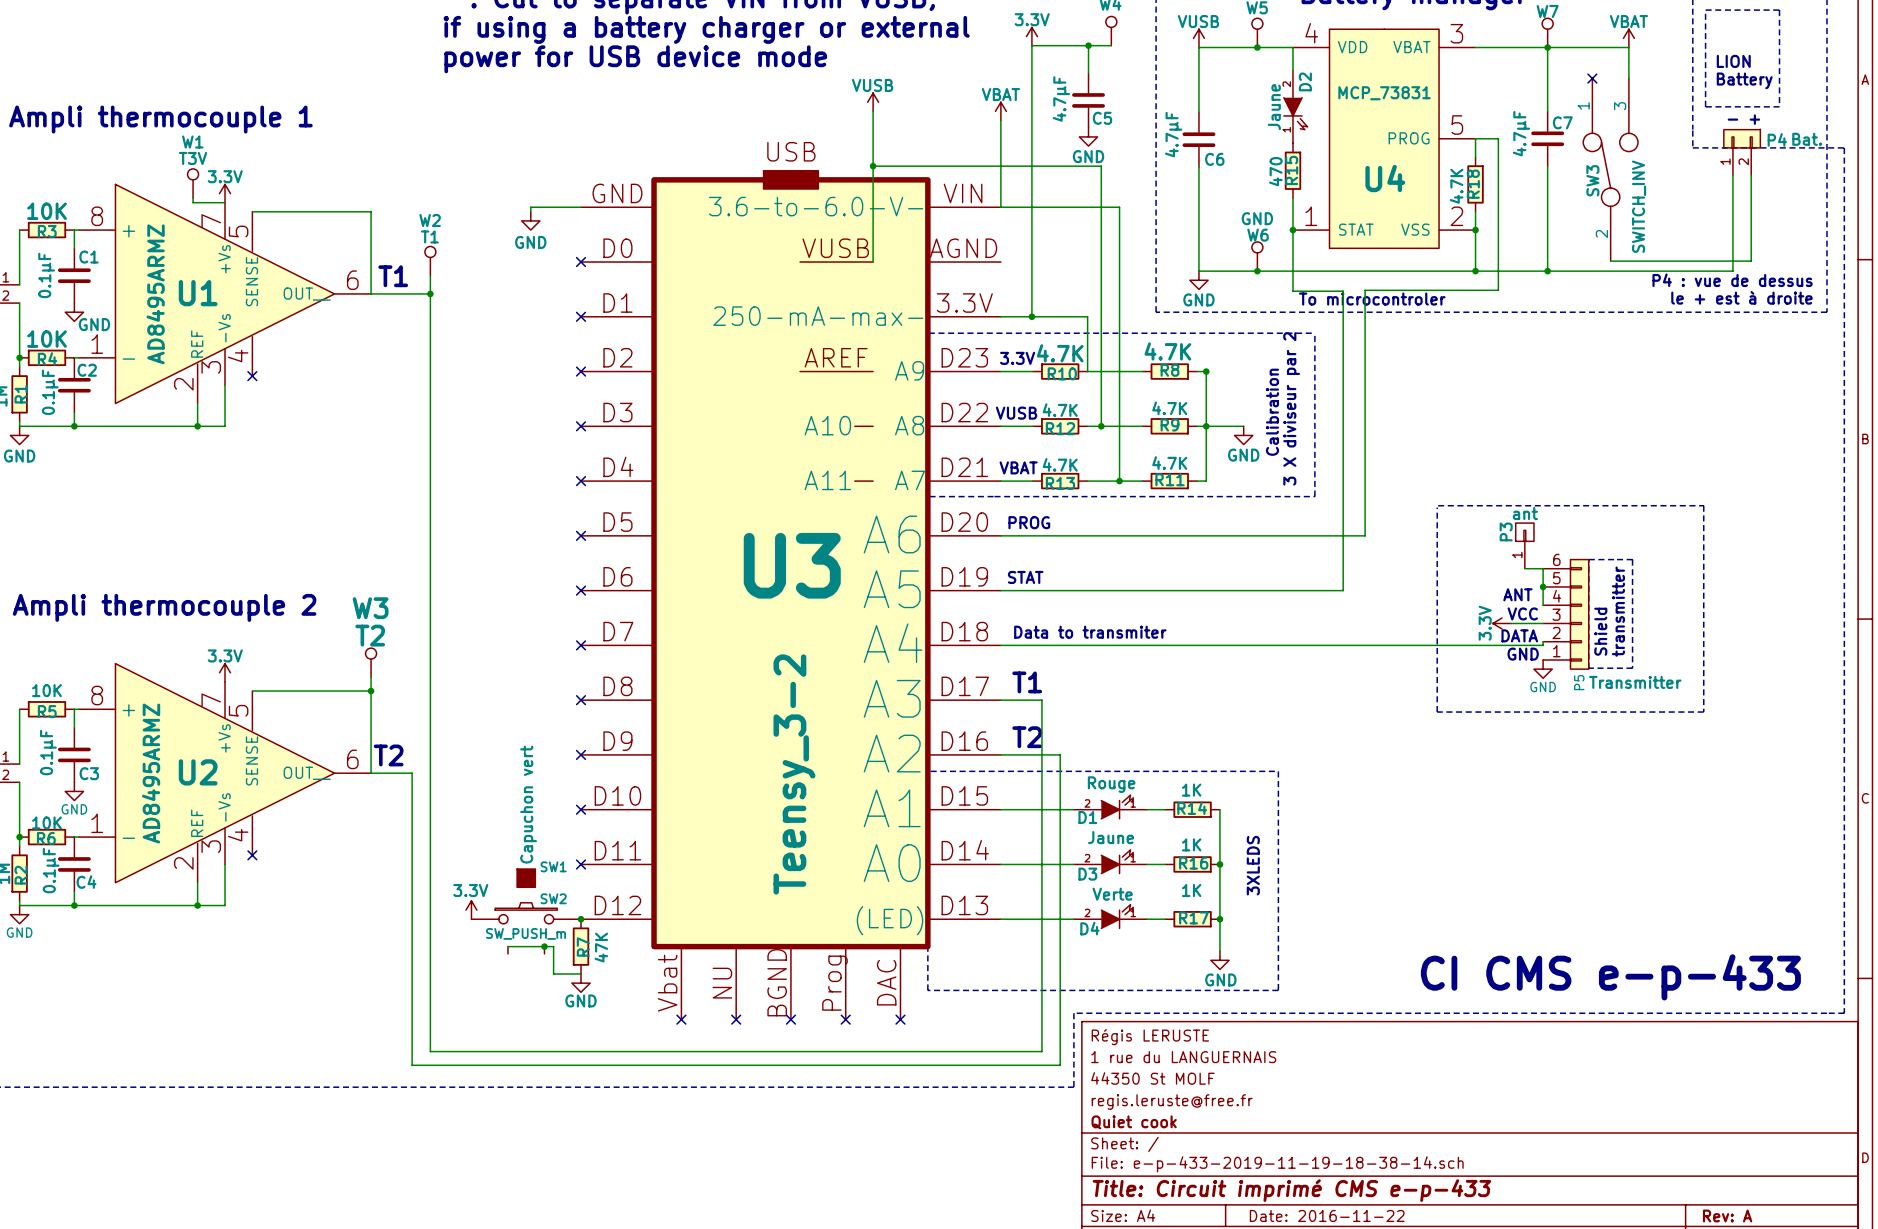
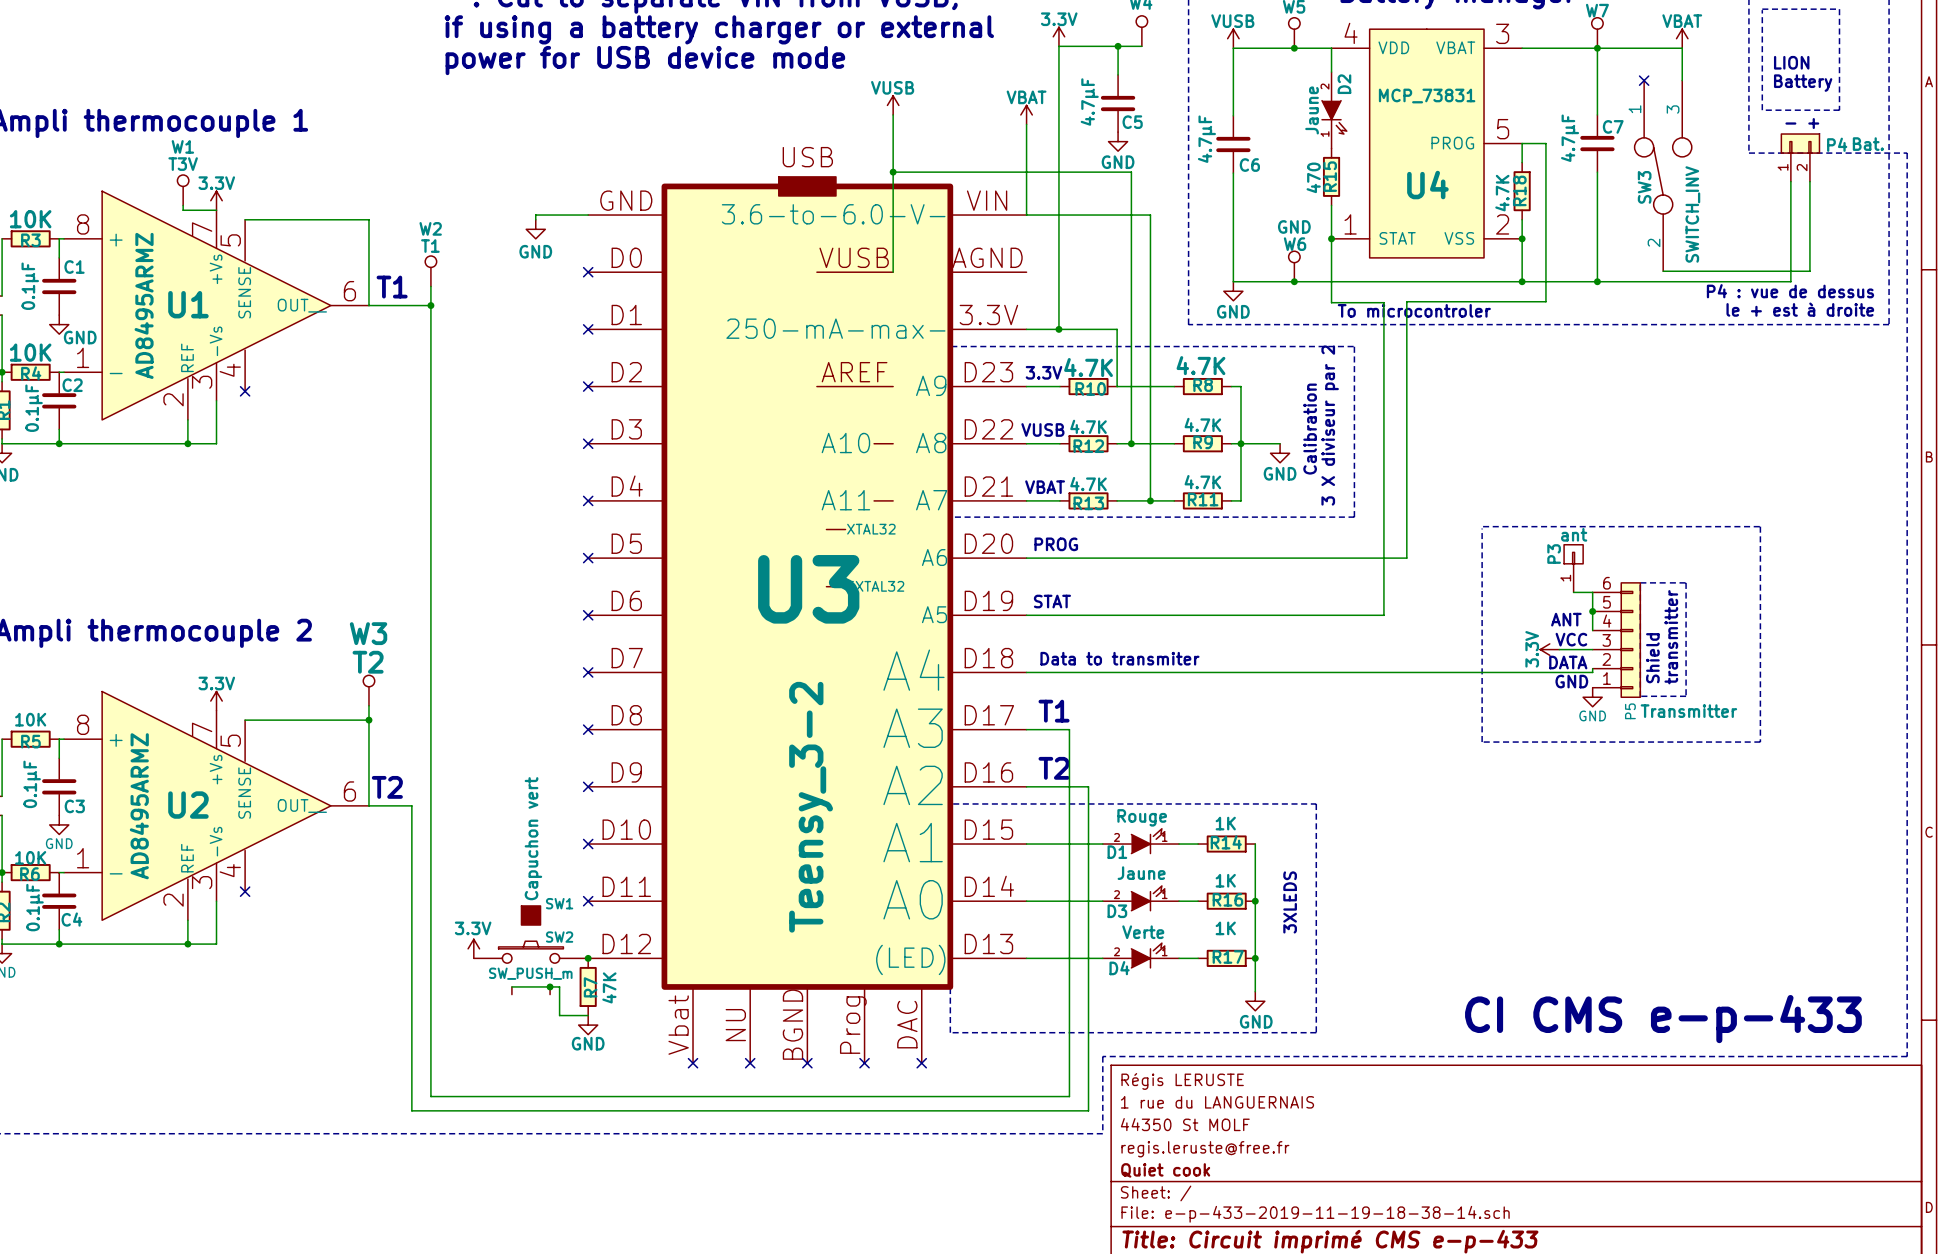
U3 symbol: [580, 170, 1001, 1020] -> [588, 176, 1027, 1064]
junction: (1206, 371) -> none

